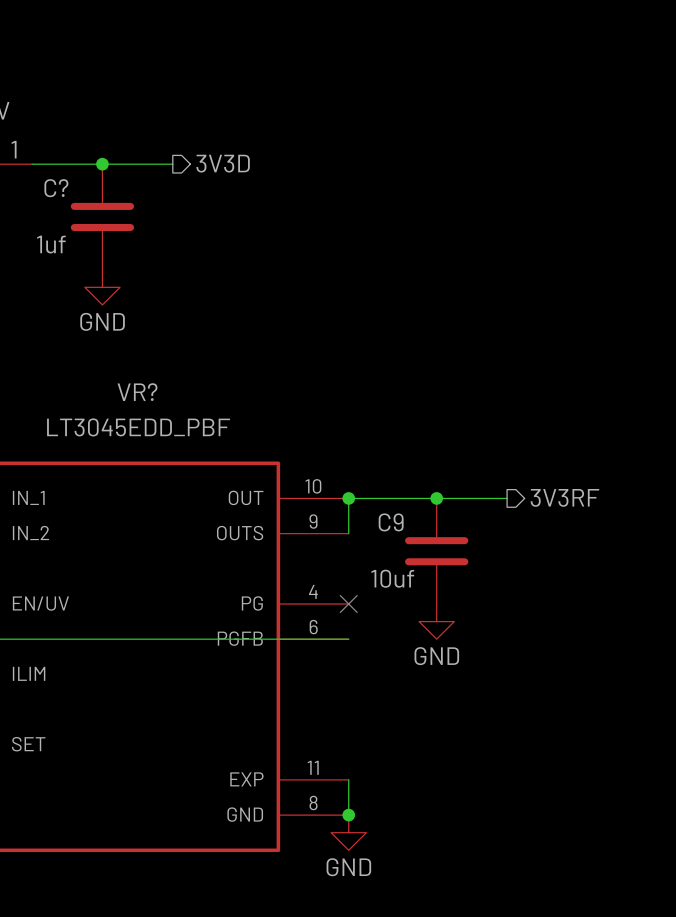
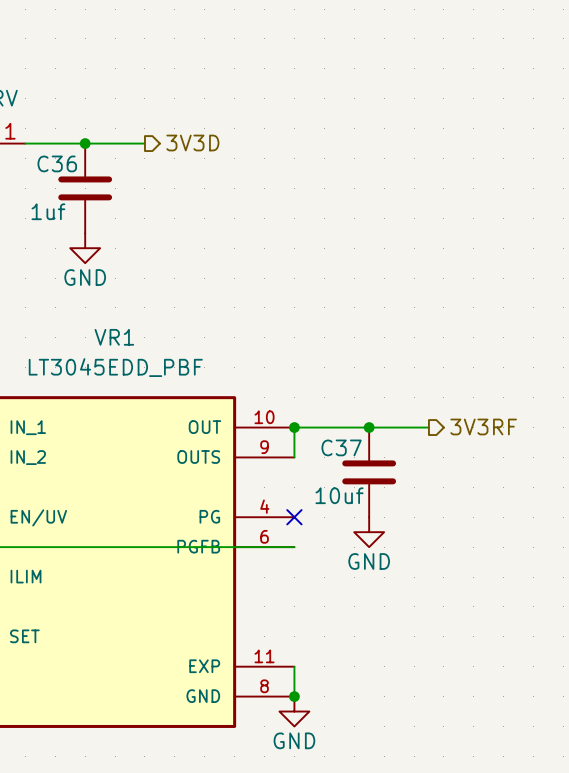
C? name: C? (56, 188) -> C36 (57, 163)
VR? name: VR? (137, 392) -> VR1 (114, 337)
C9 name: C9 (391, 522) -> C37 (341, 447)

